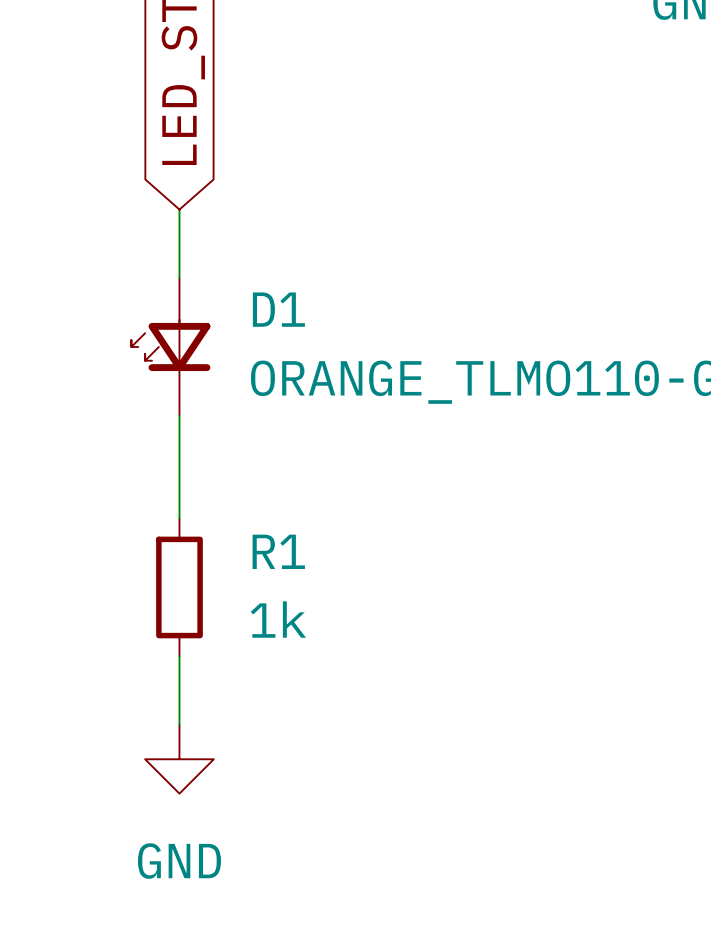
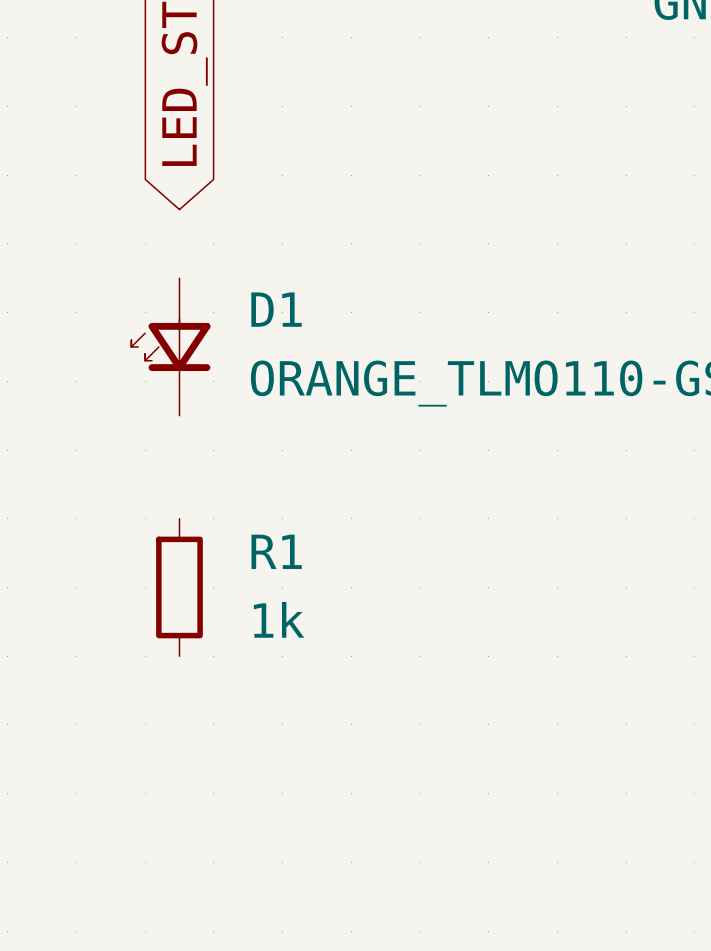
wire: (179, 209) (179, 278) -> none
wire: (179, 415) (179, 518) -> none
wire: (179, 656) (179, 724) -> none
power symbol: GND (179, 759) -> none

